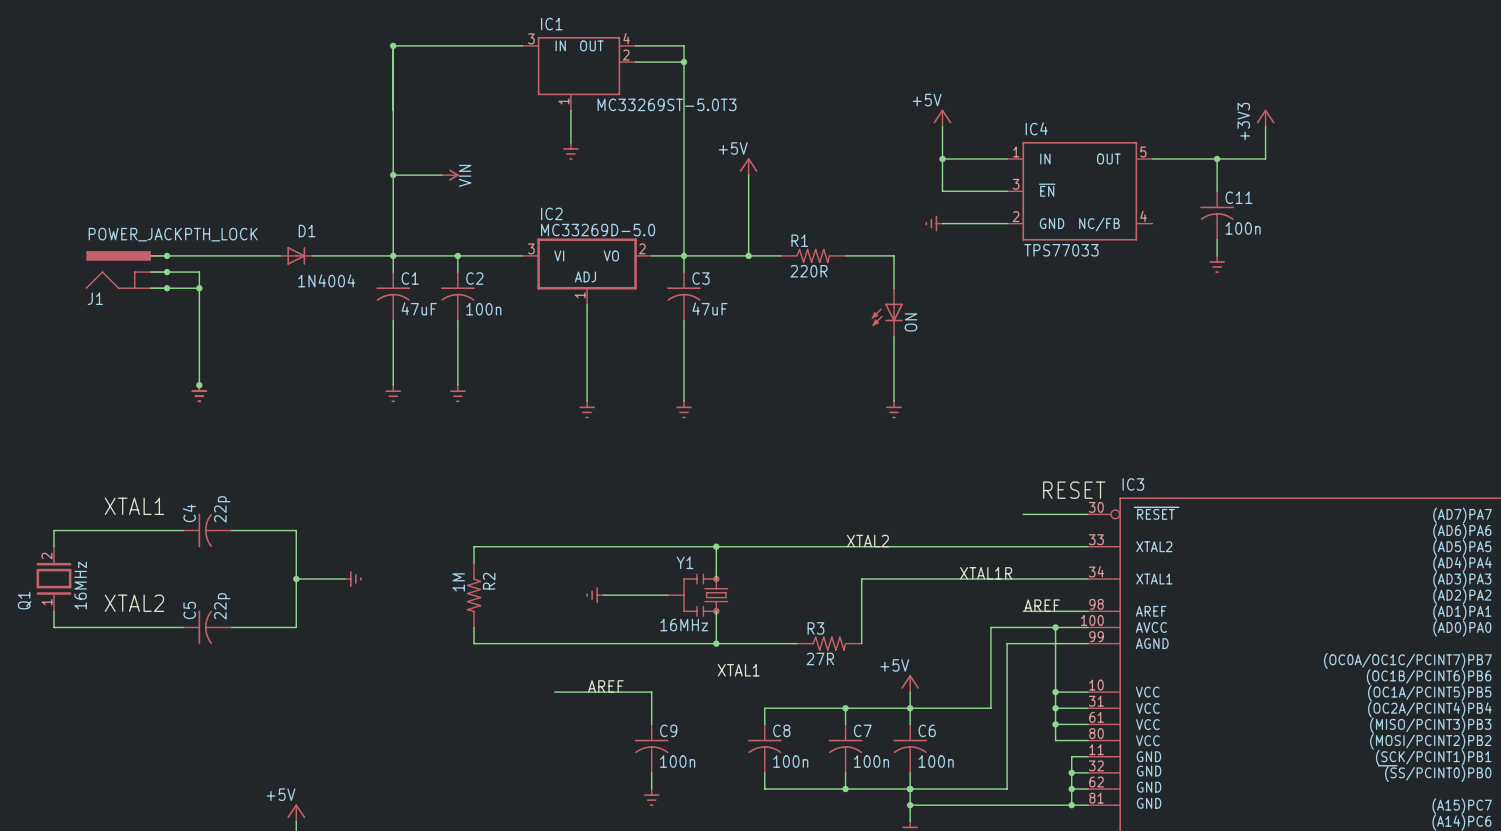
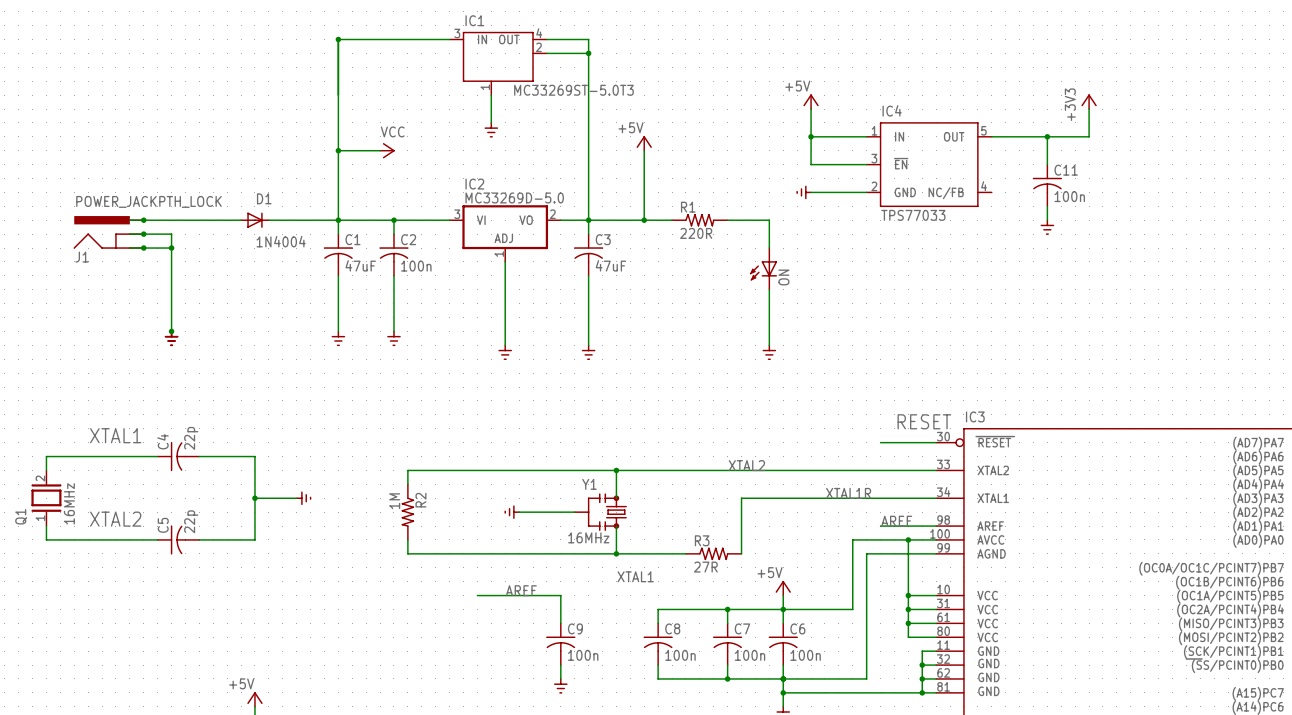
power symbol: VIN (450, 175) -> VCC (387, 150)

